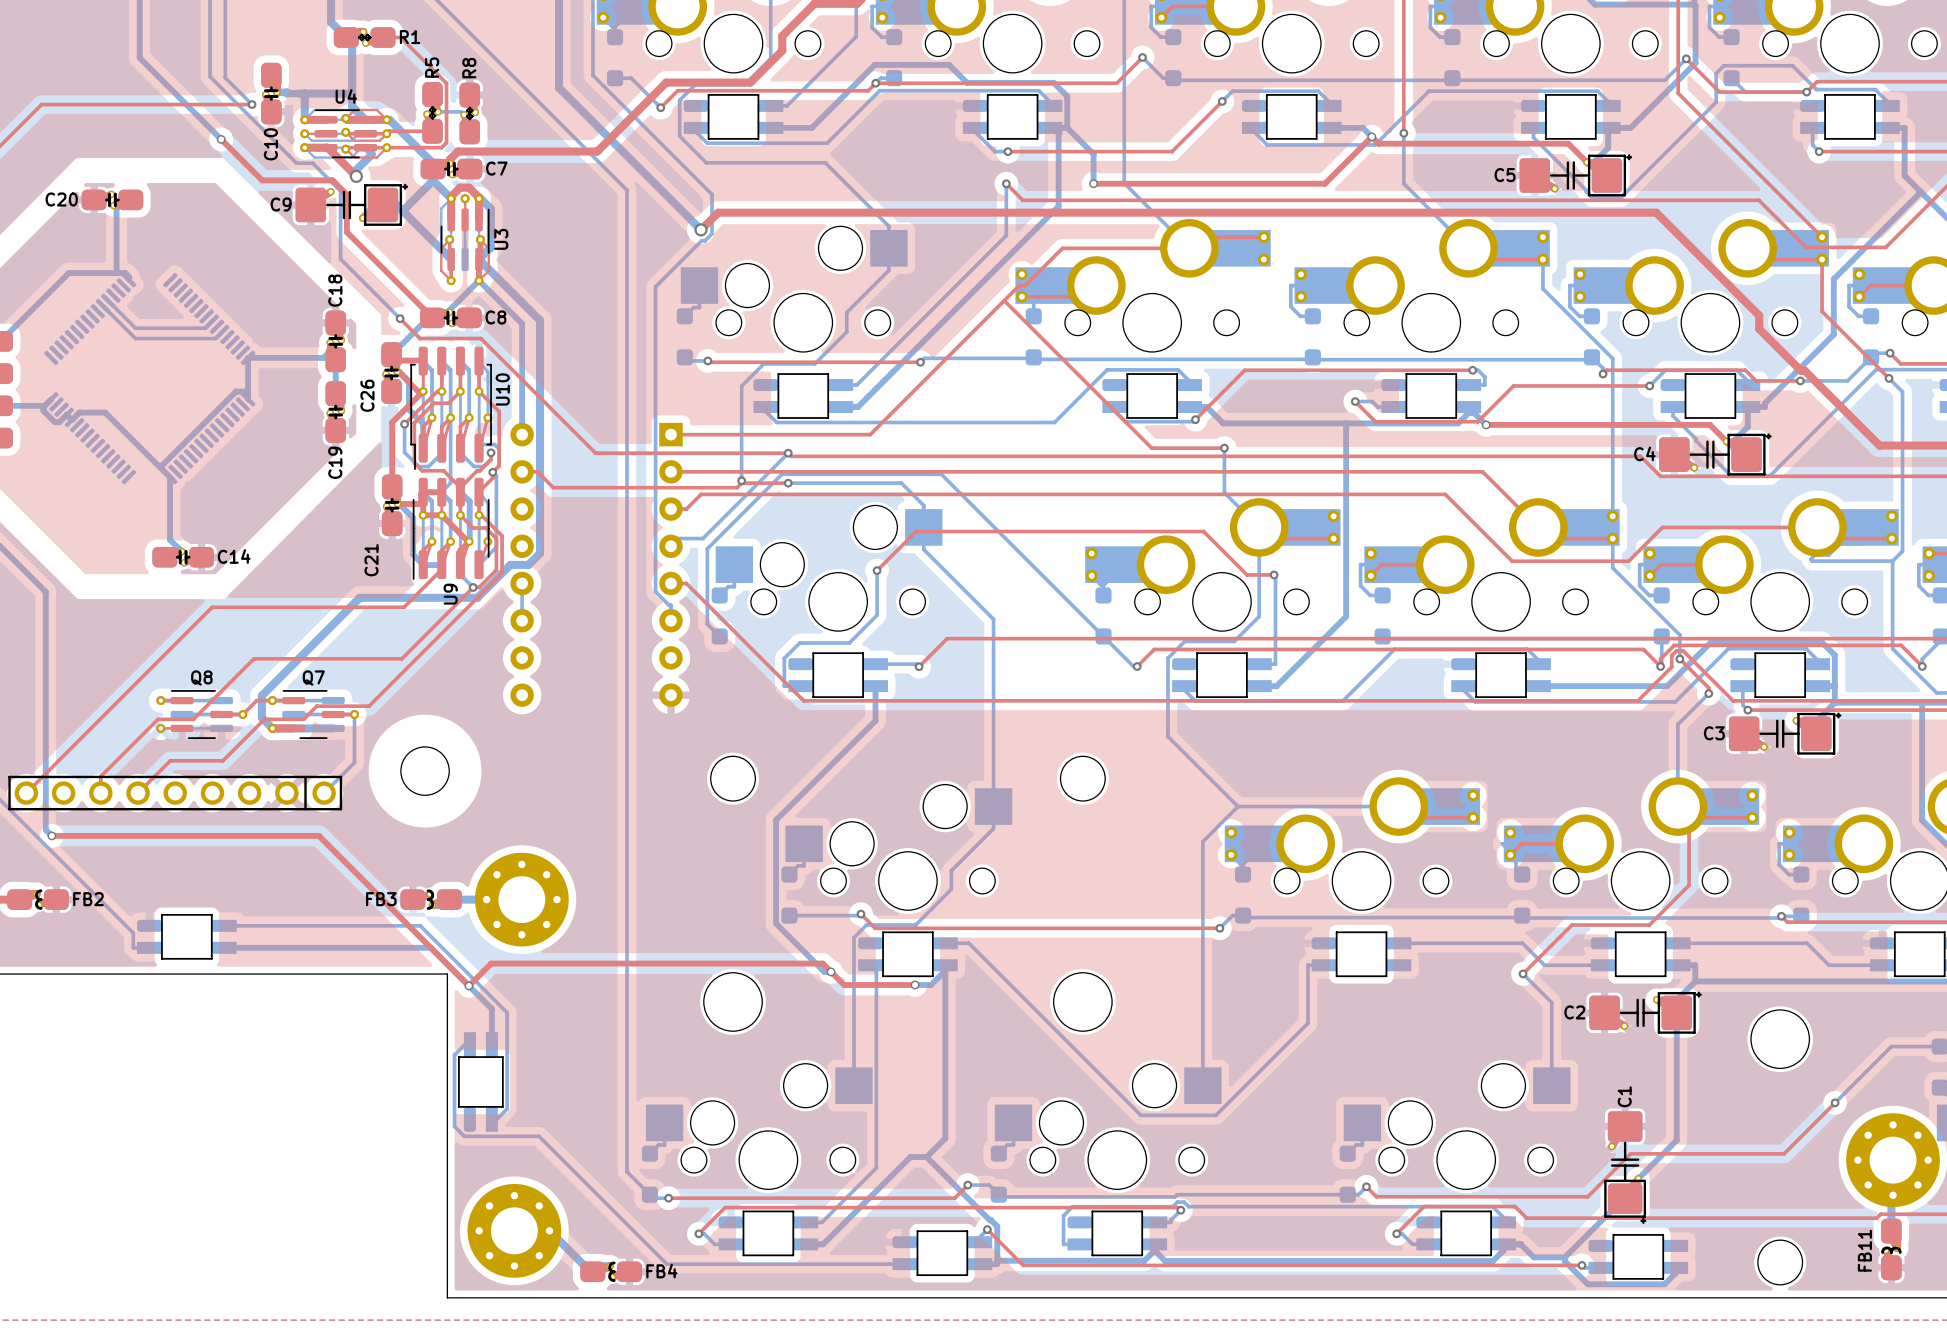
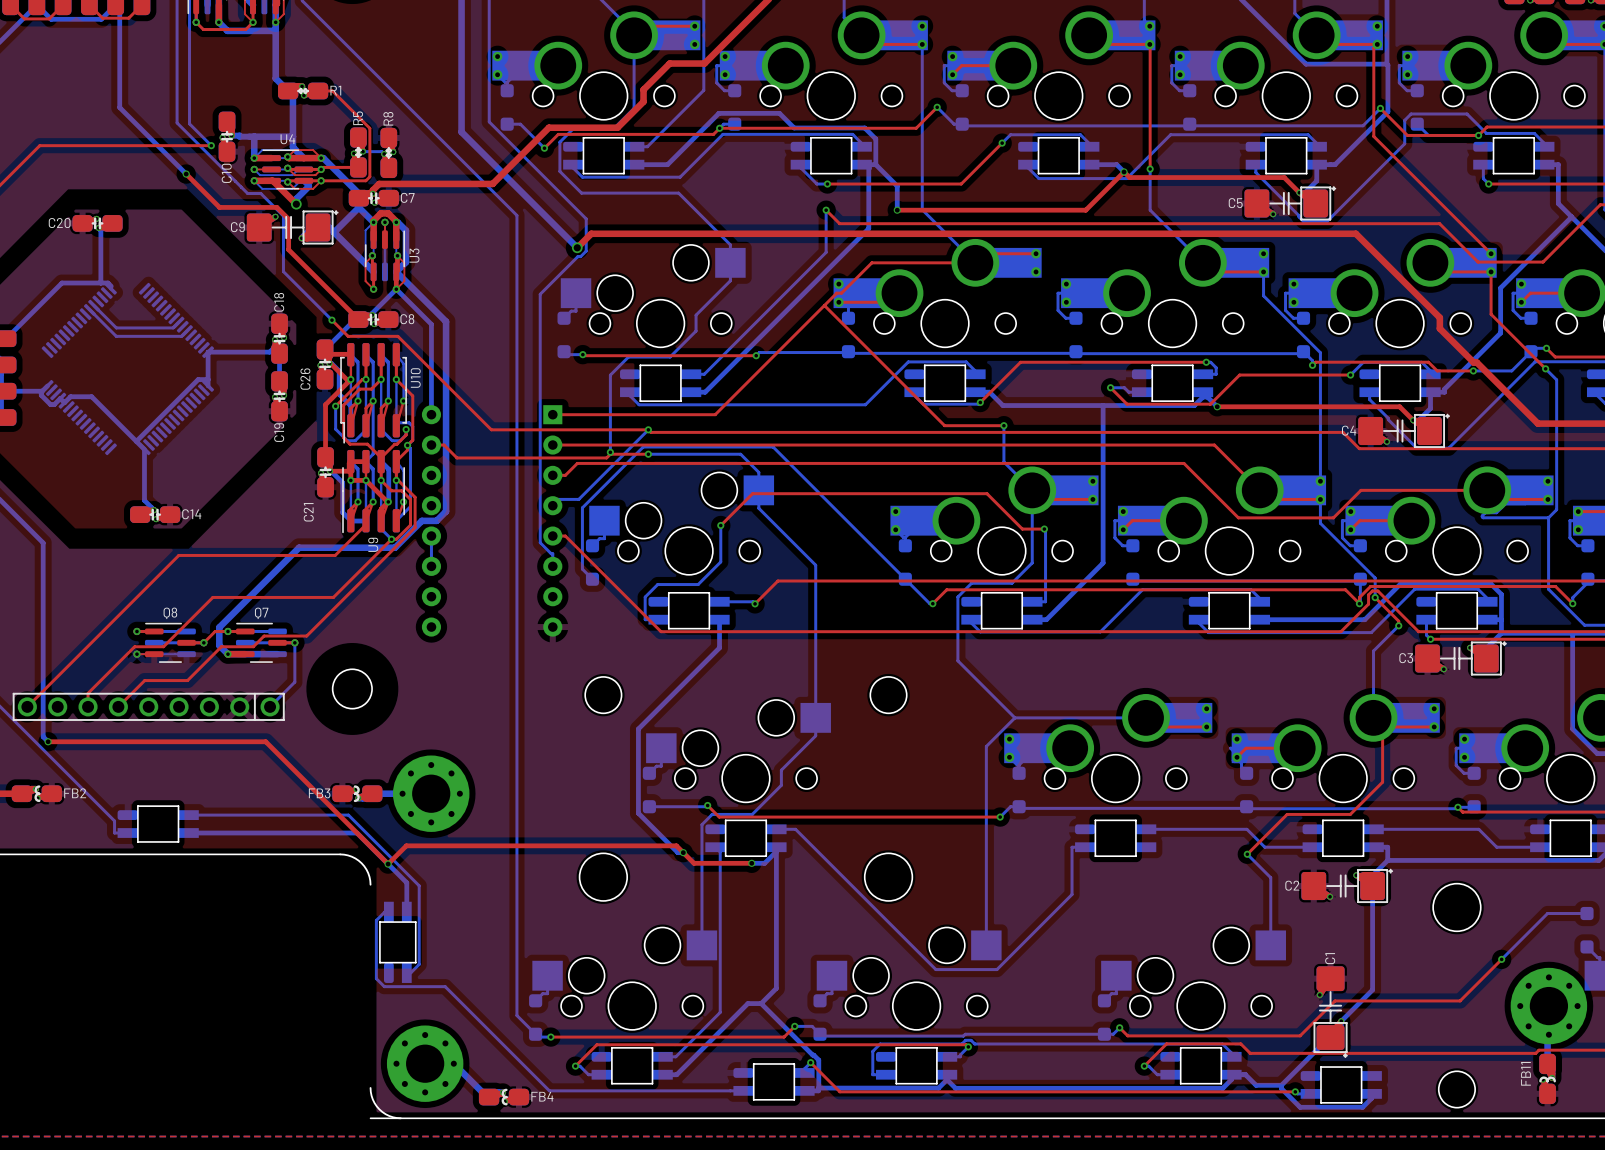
board edge: (410, 974) (447, 974) (447, 1297) -> (340, 854) (351, 856) (361, 863) (368, 873) (370, 884)
board edge: none -> (370, 1087) (372, 1099) (379, 1109) (389, 1116) (400, 1118)

